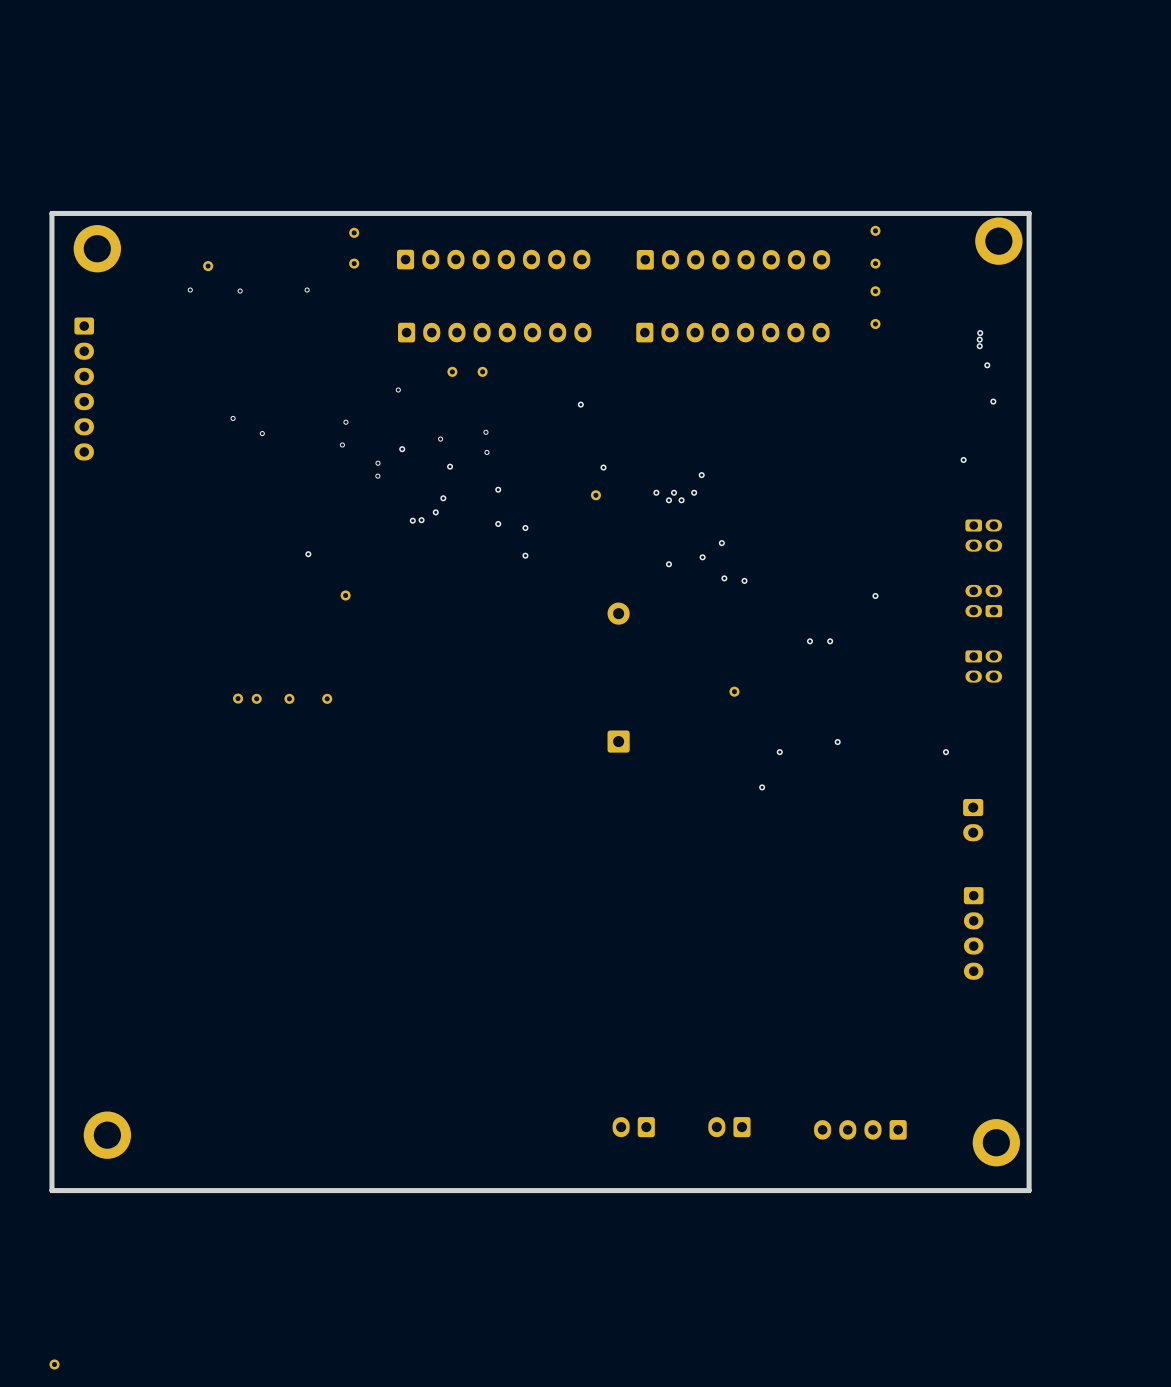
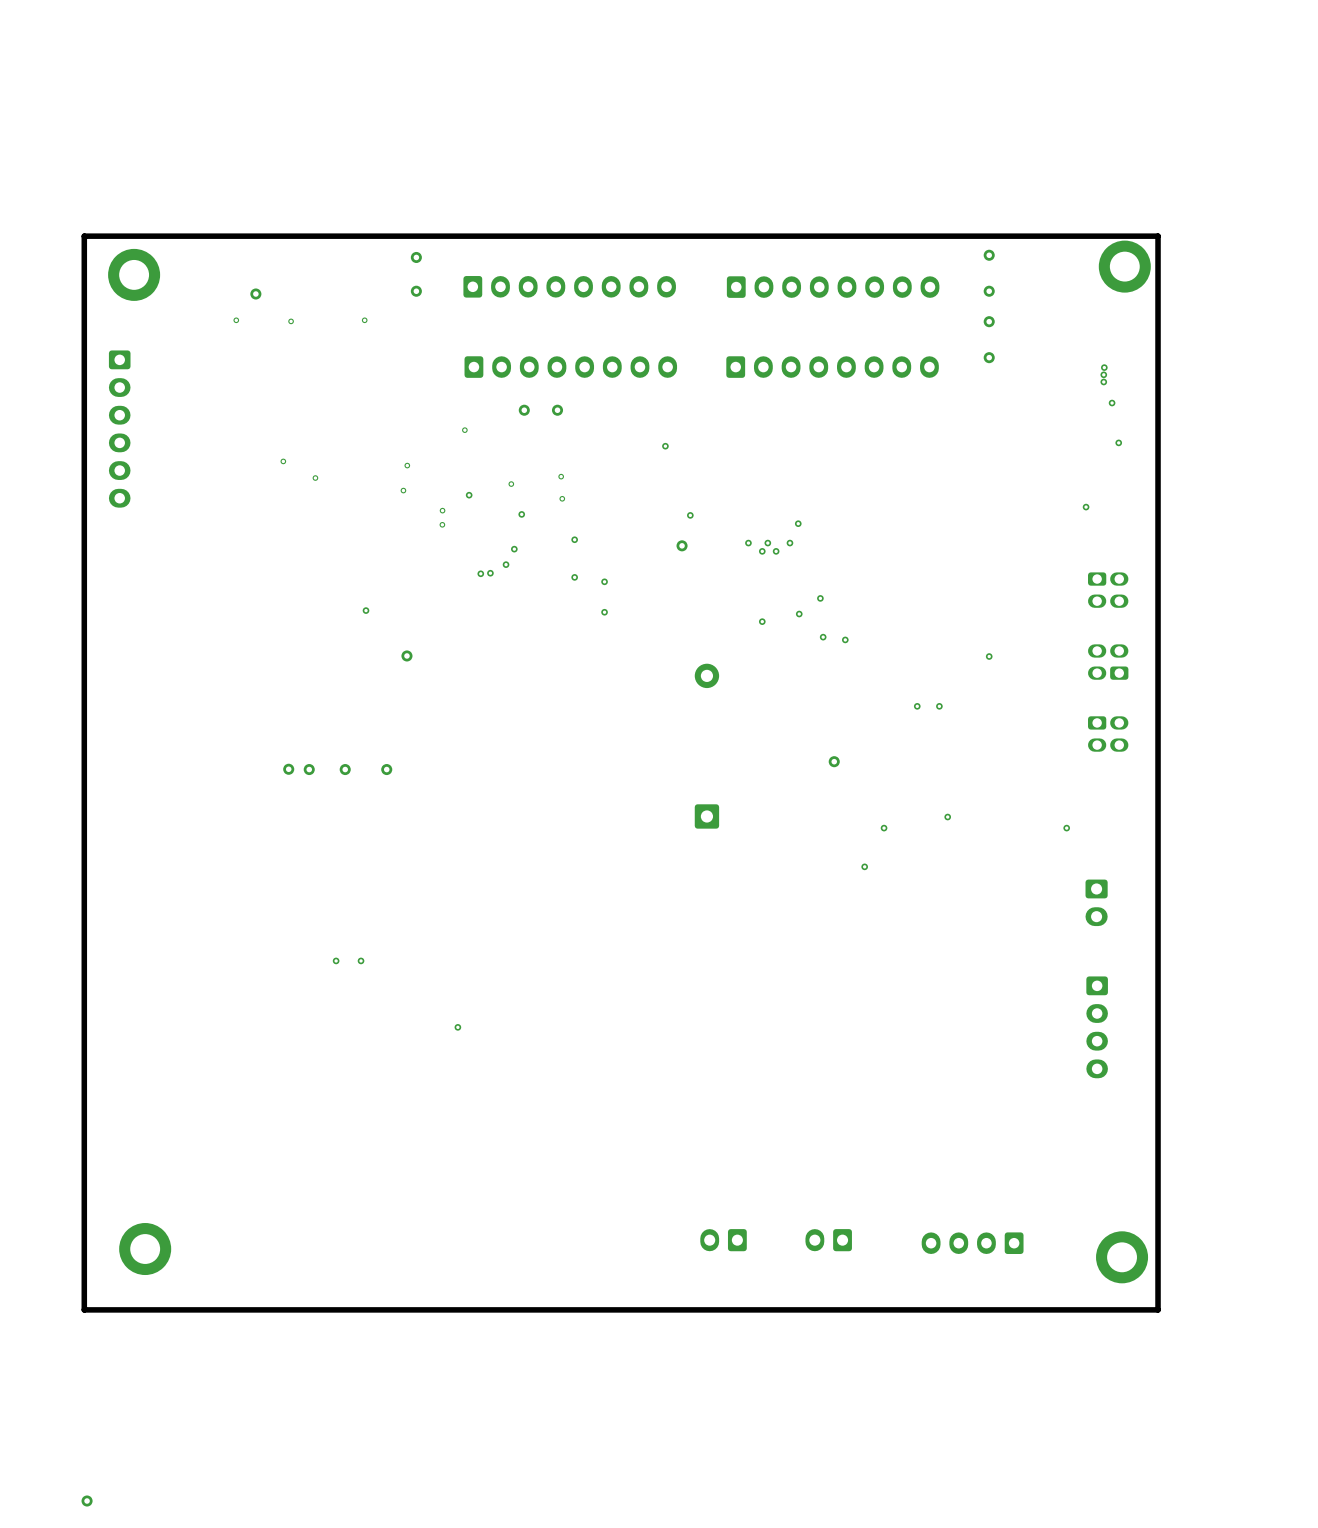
via: none -> (336, 960)
via: none -> (361, 960)
via: none -> (457, 1027)

